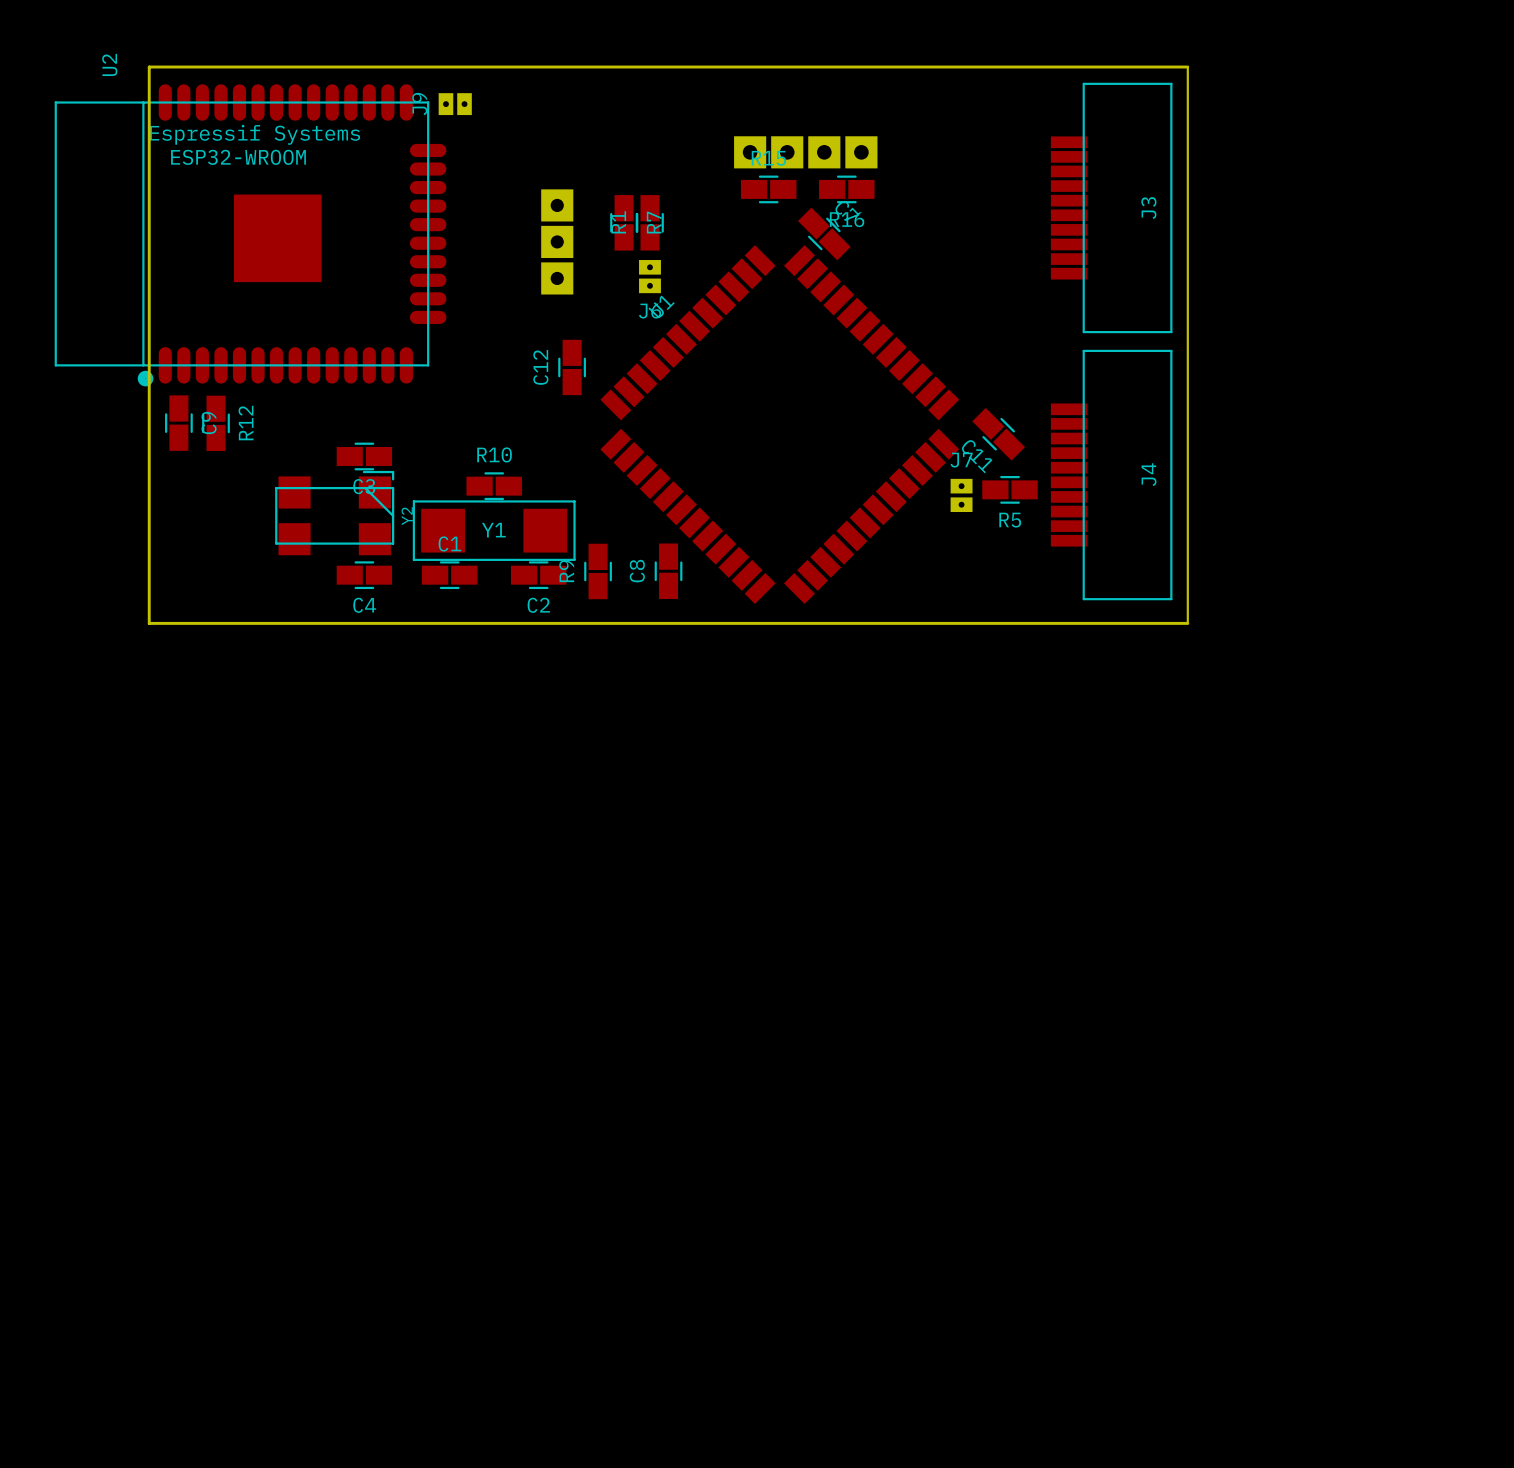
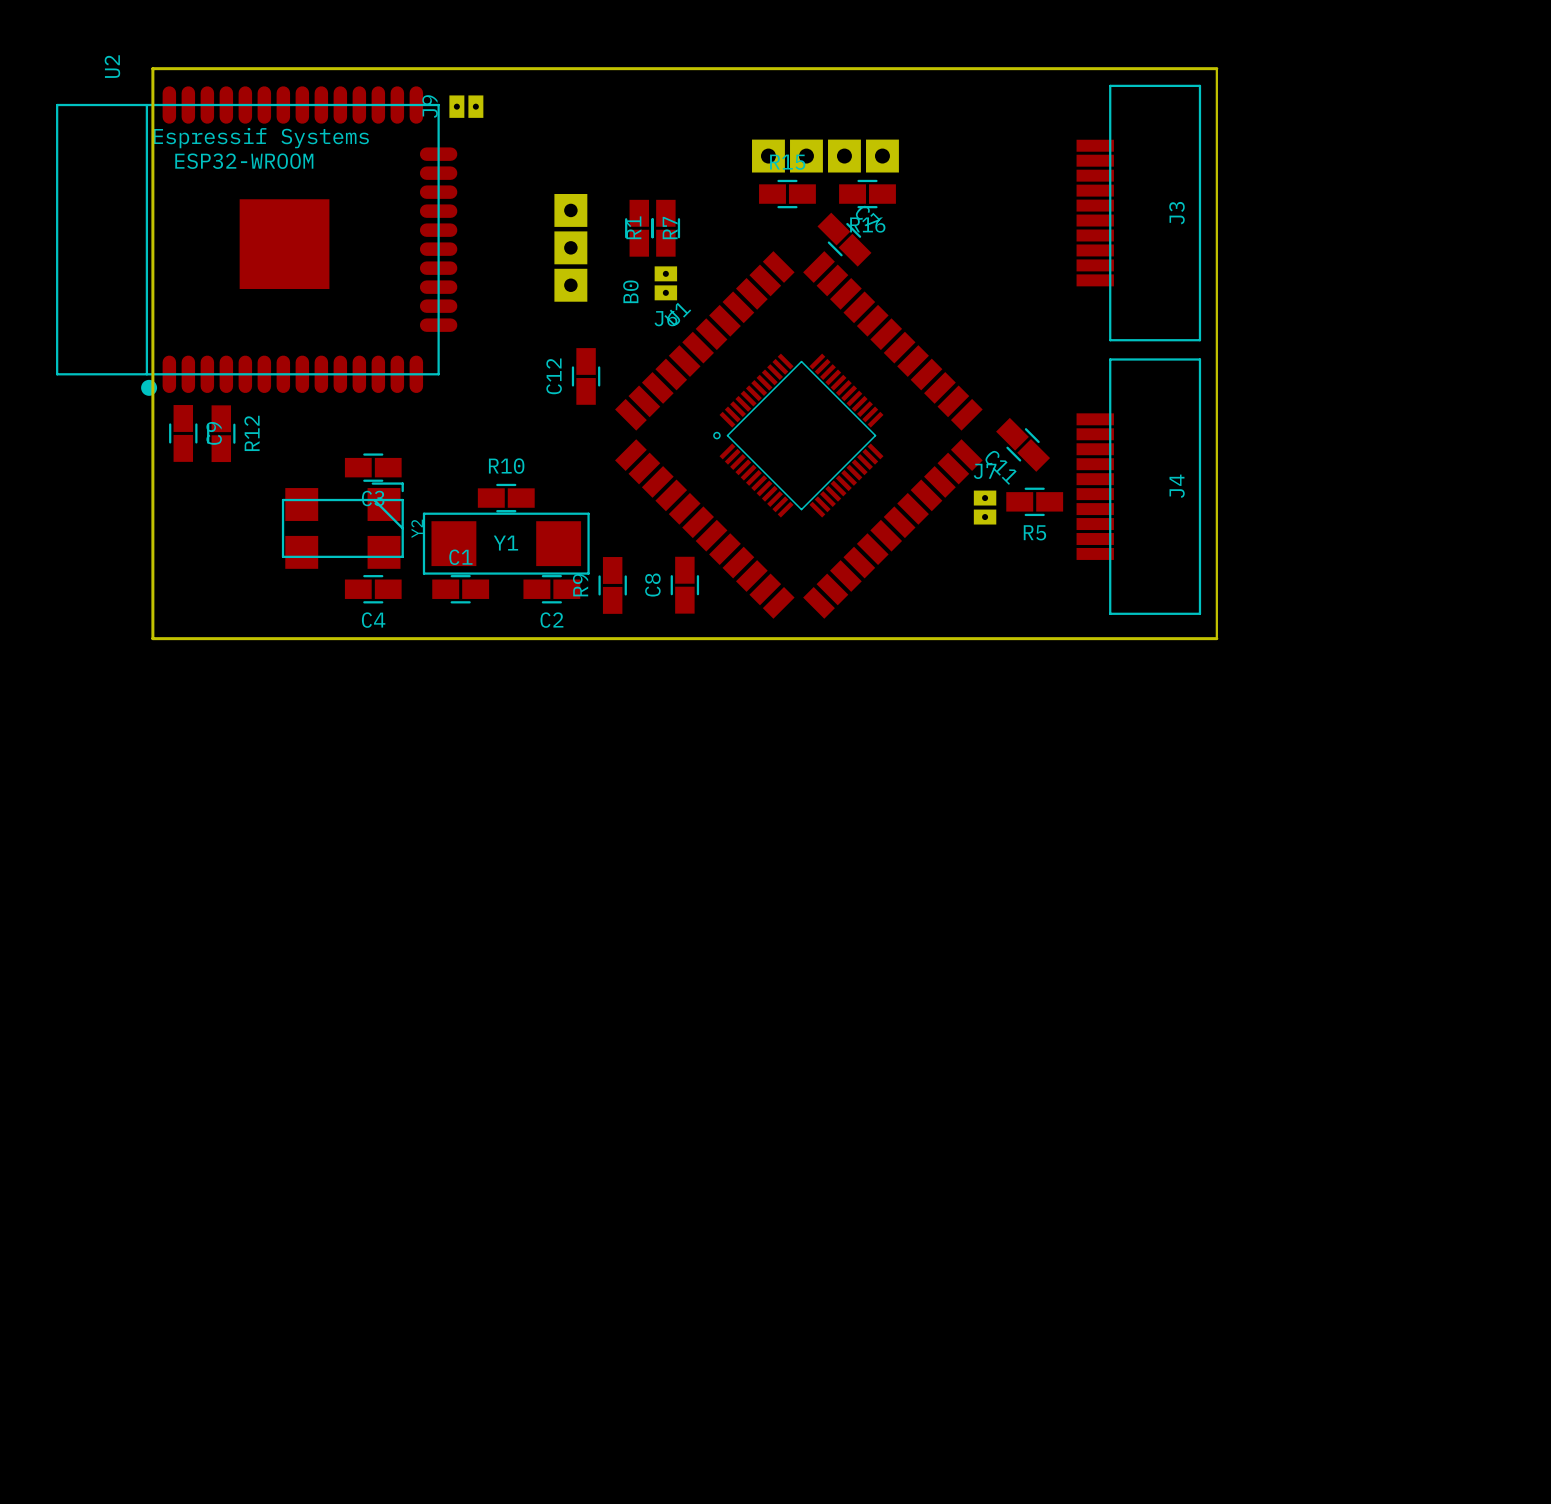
U1 footprint: [600, 245, 960, 604] -> [615, 251, 983, 619]
text: none -> B0 (630, 291)

